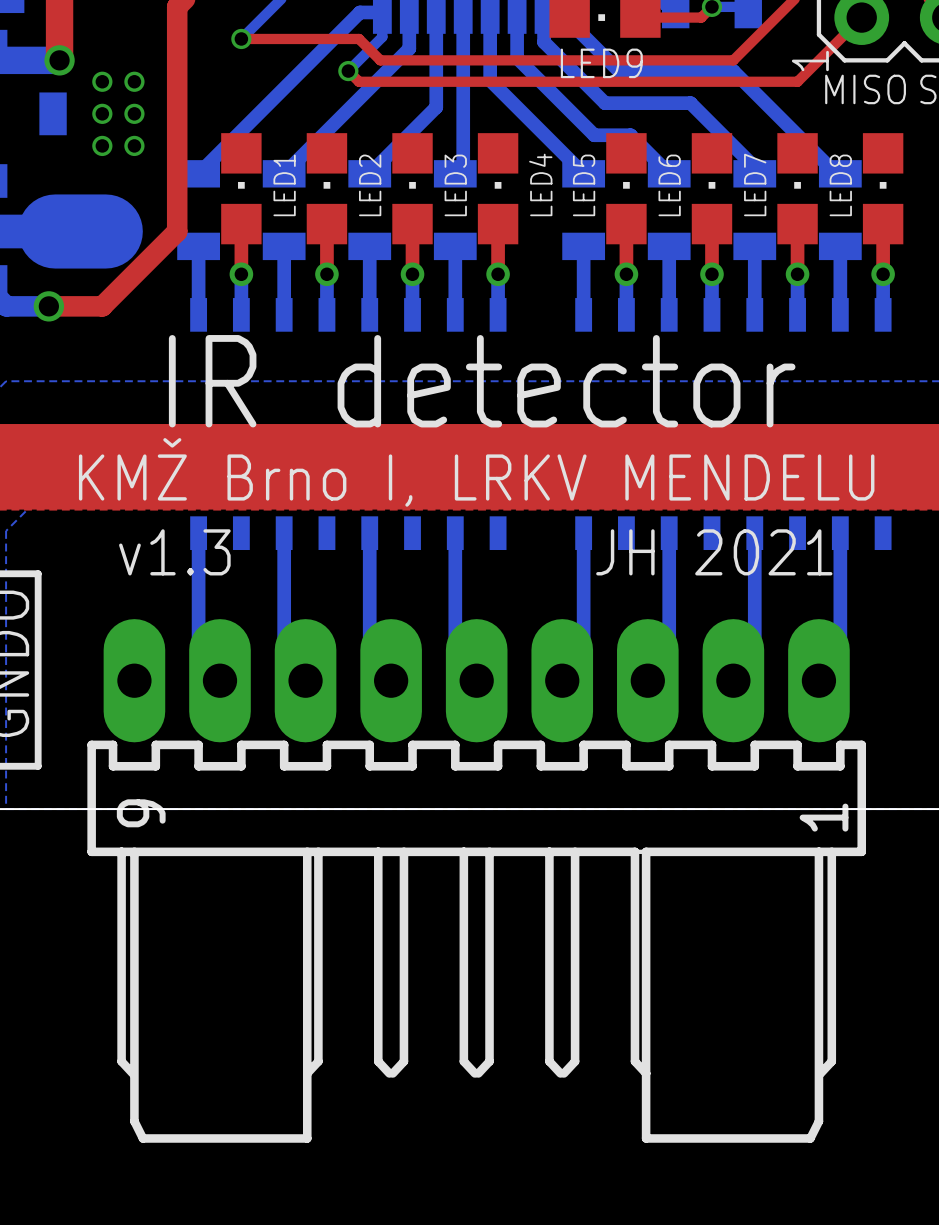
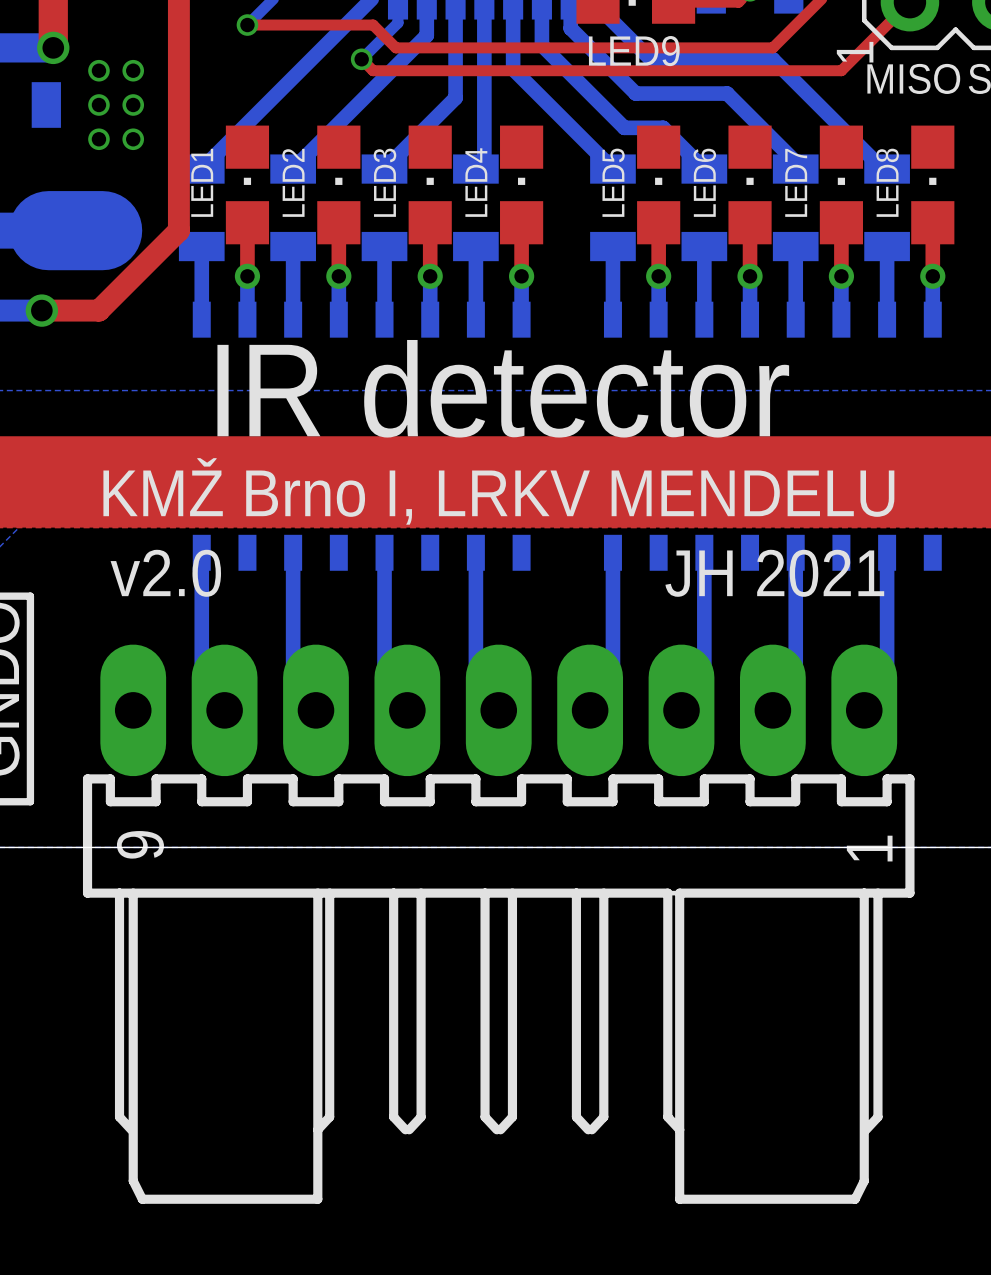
LED4 name position: LED4 (540, 184) -> LED4 (476, 182)
LED1 name position: LED1 (284, 185) -> LED1 (202, 182)
LED2 name position: LED2 (370, 185) -> LED2 (293, 182)
LED3 name position: LED3 (455, 185) -> LED3 (384, 182)
text: v1.3 (174, 552) -> v2.0 (165, 573)

